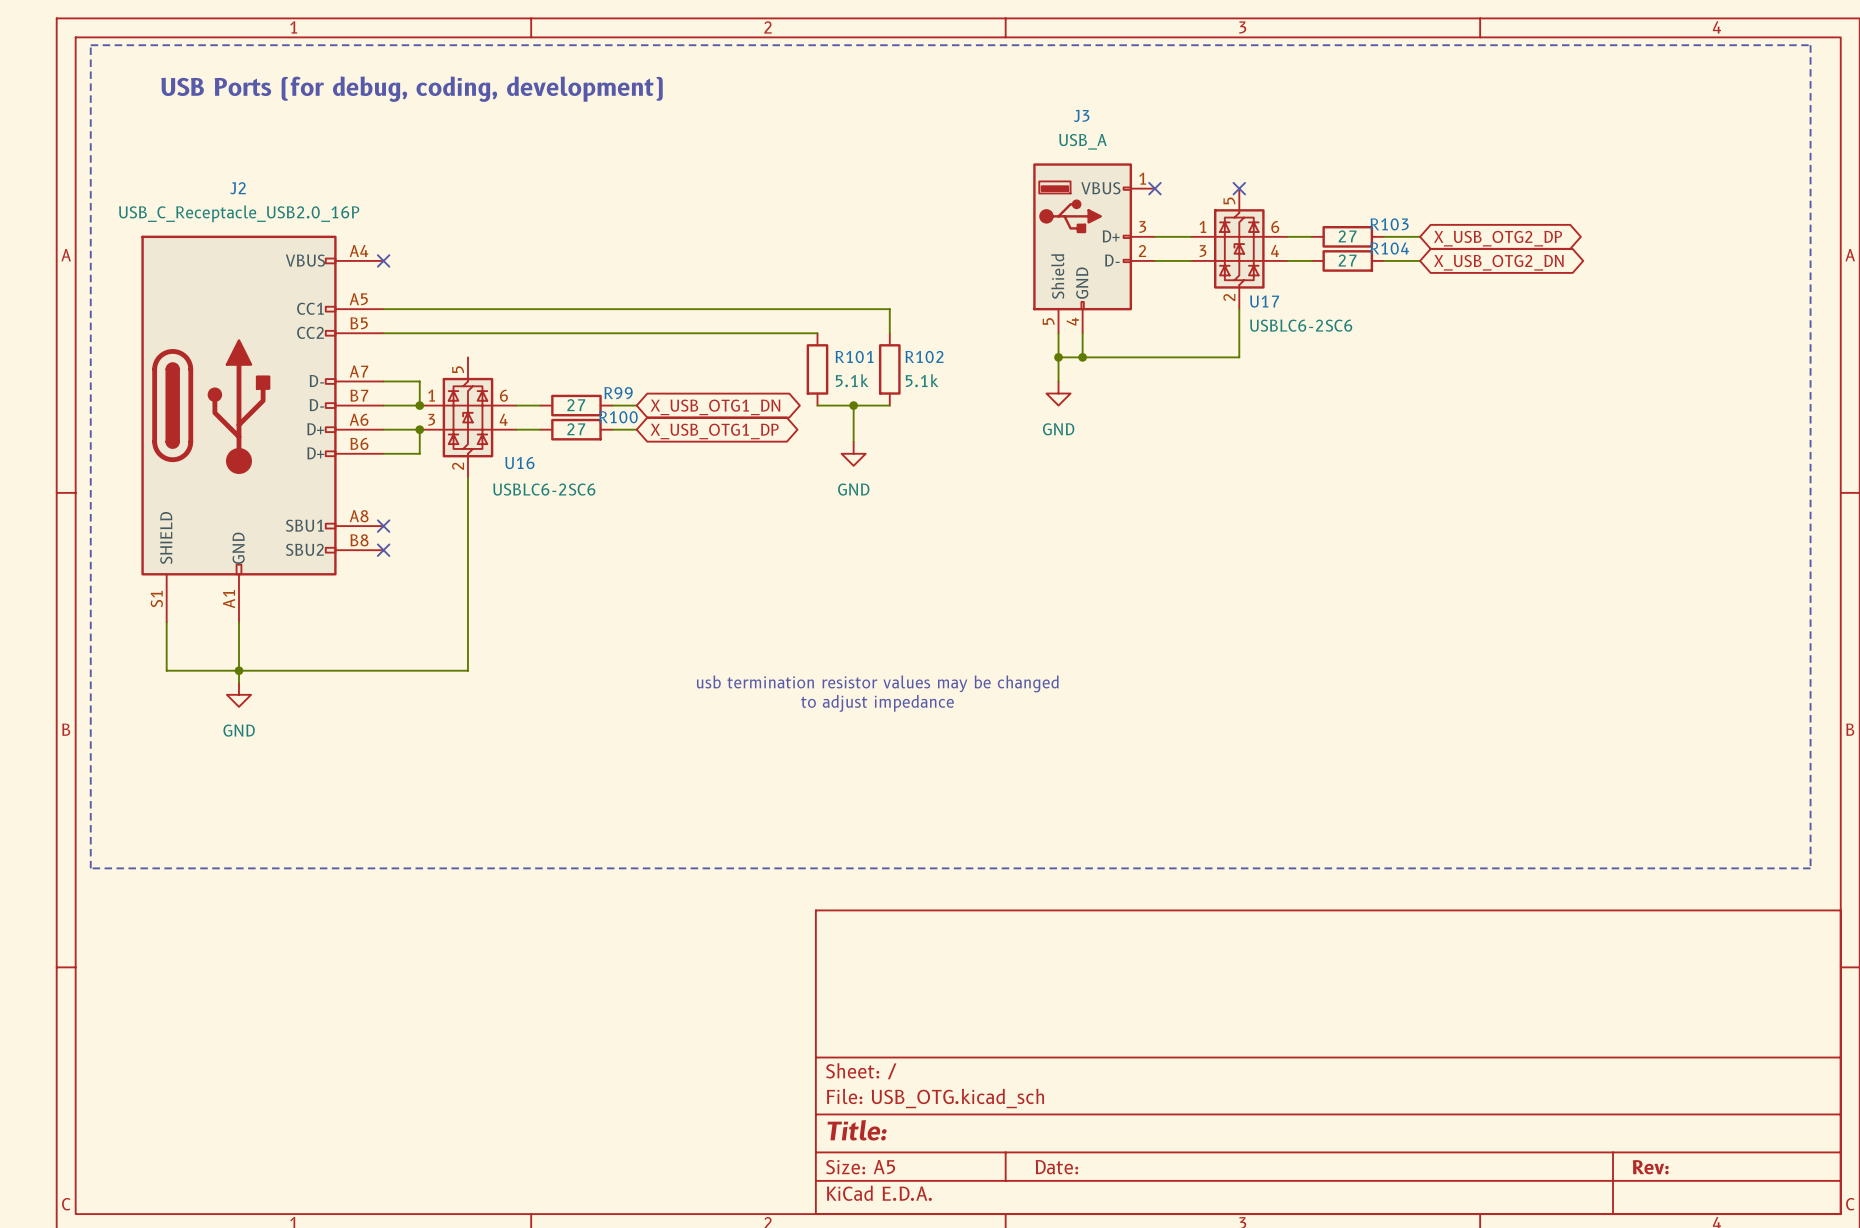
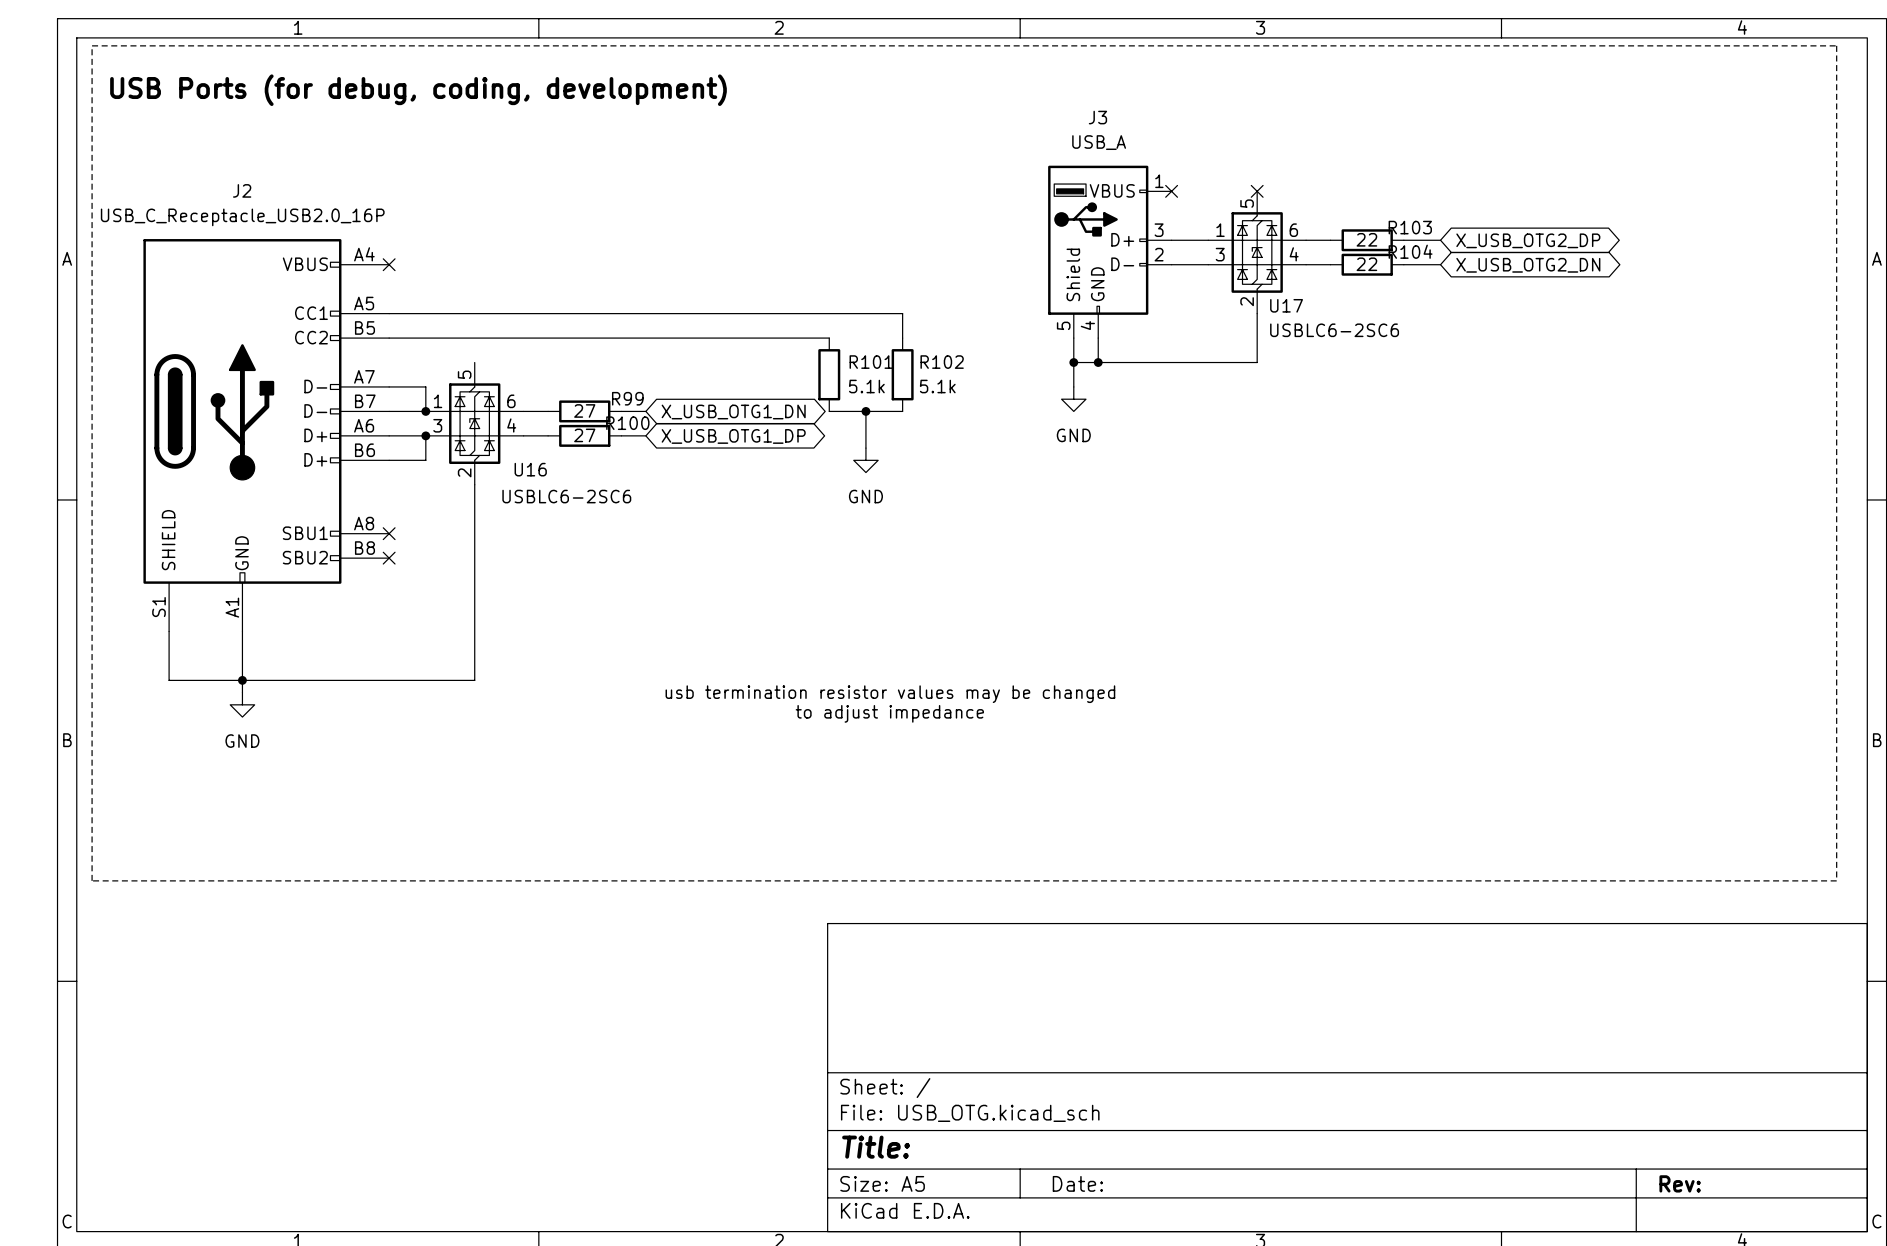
R103 value: 27 (1347, 236) -> 22 (1366, 239)
R104 value: 27 (1347, 260) -> 22 (1366, 264)

